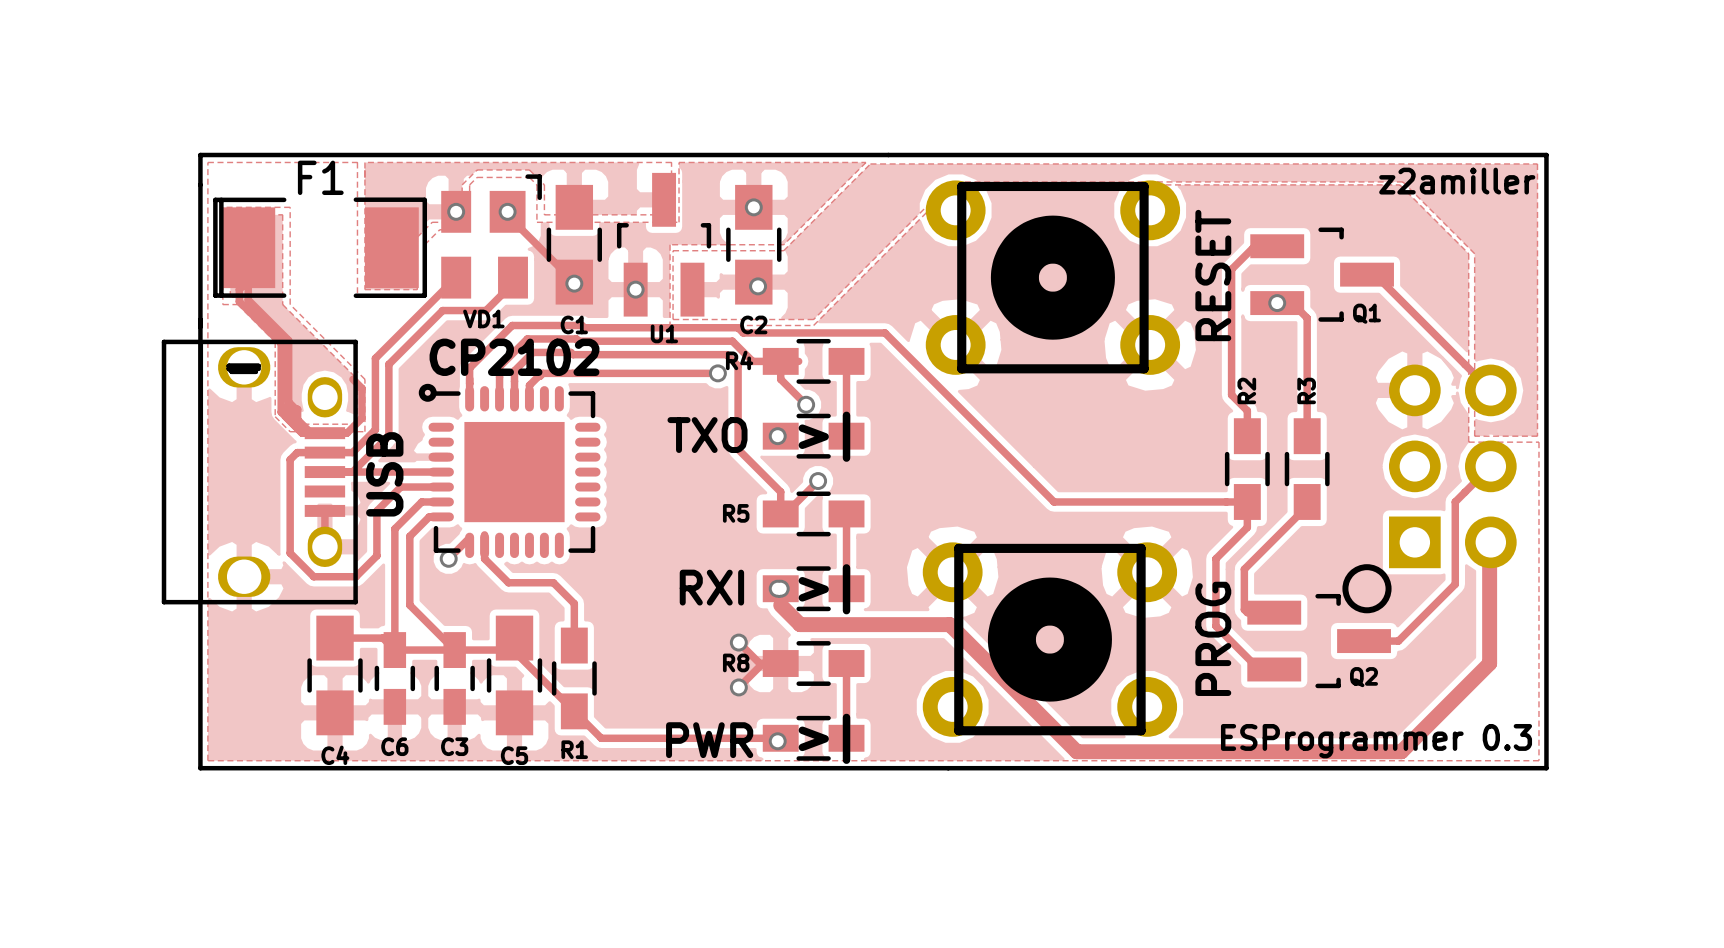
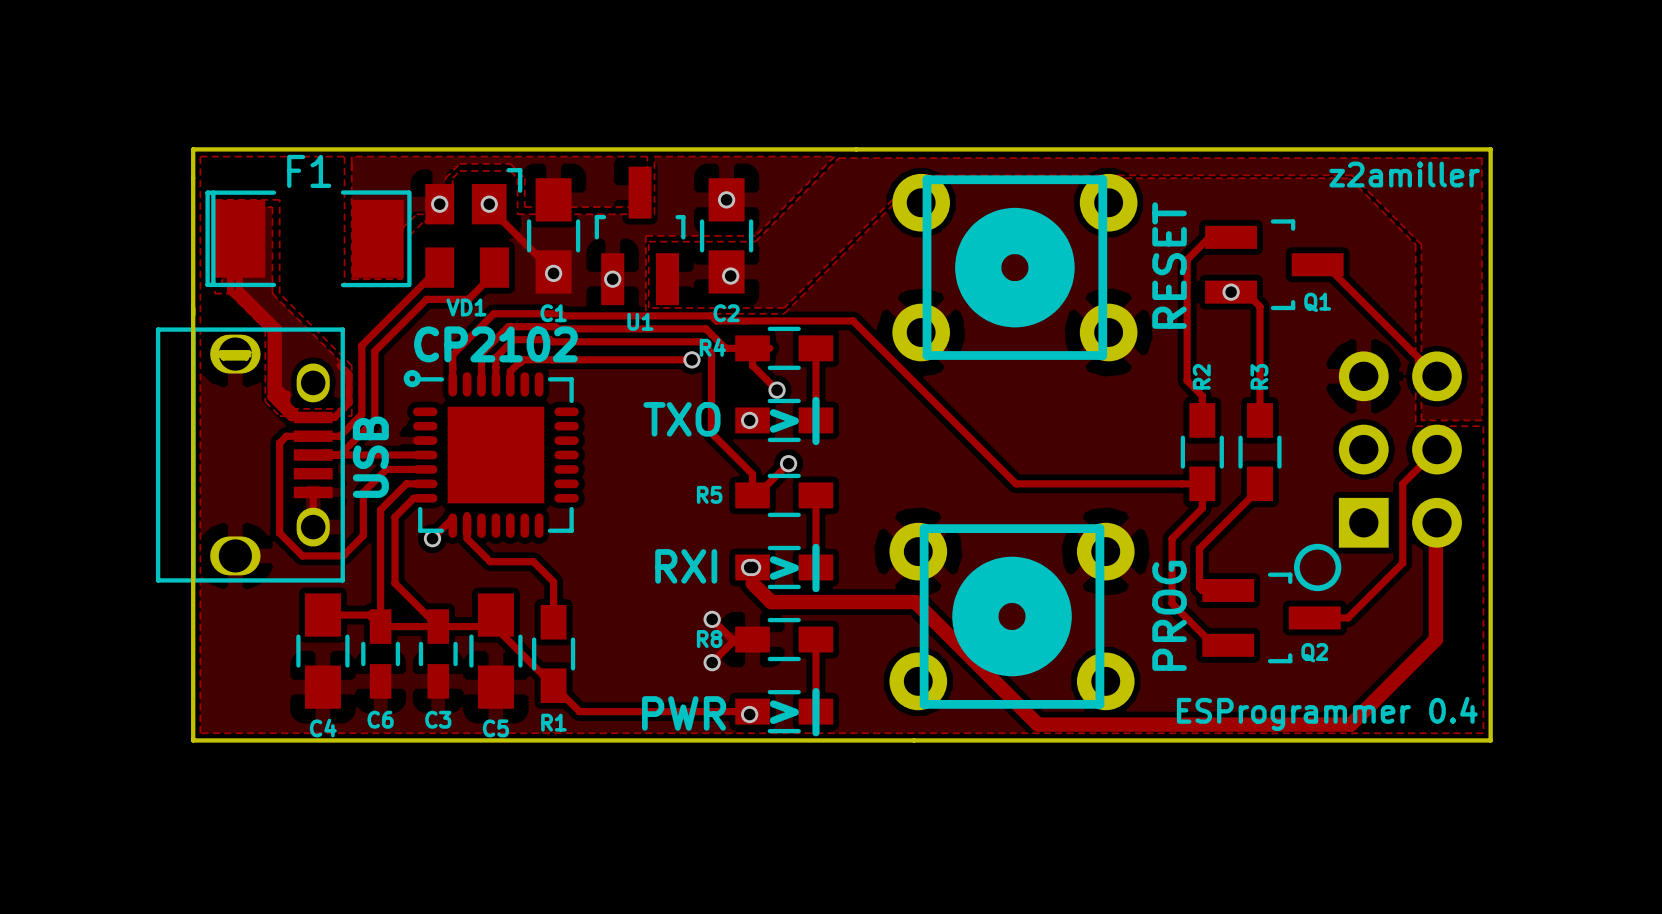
text: ESProgrammer 0.3 (1376, 741) -> ESProgrammer 0.4 (1327, 713)

